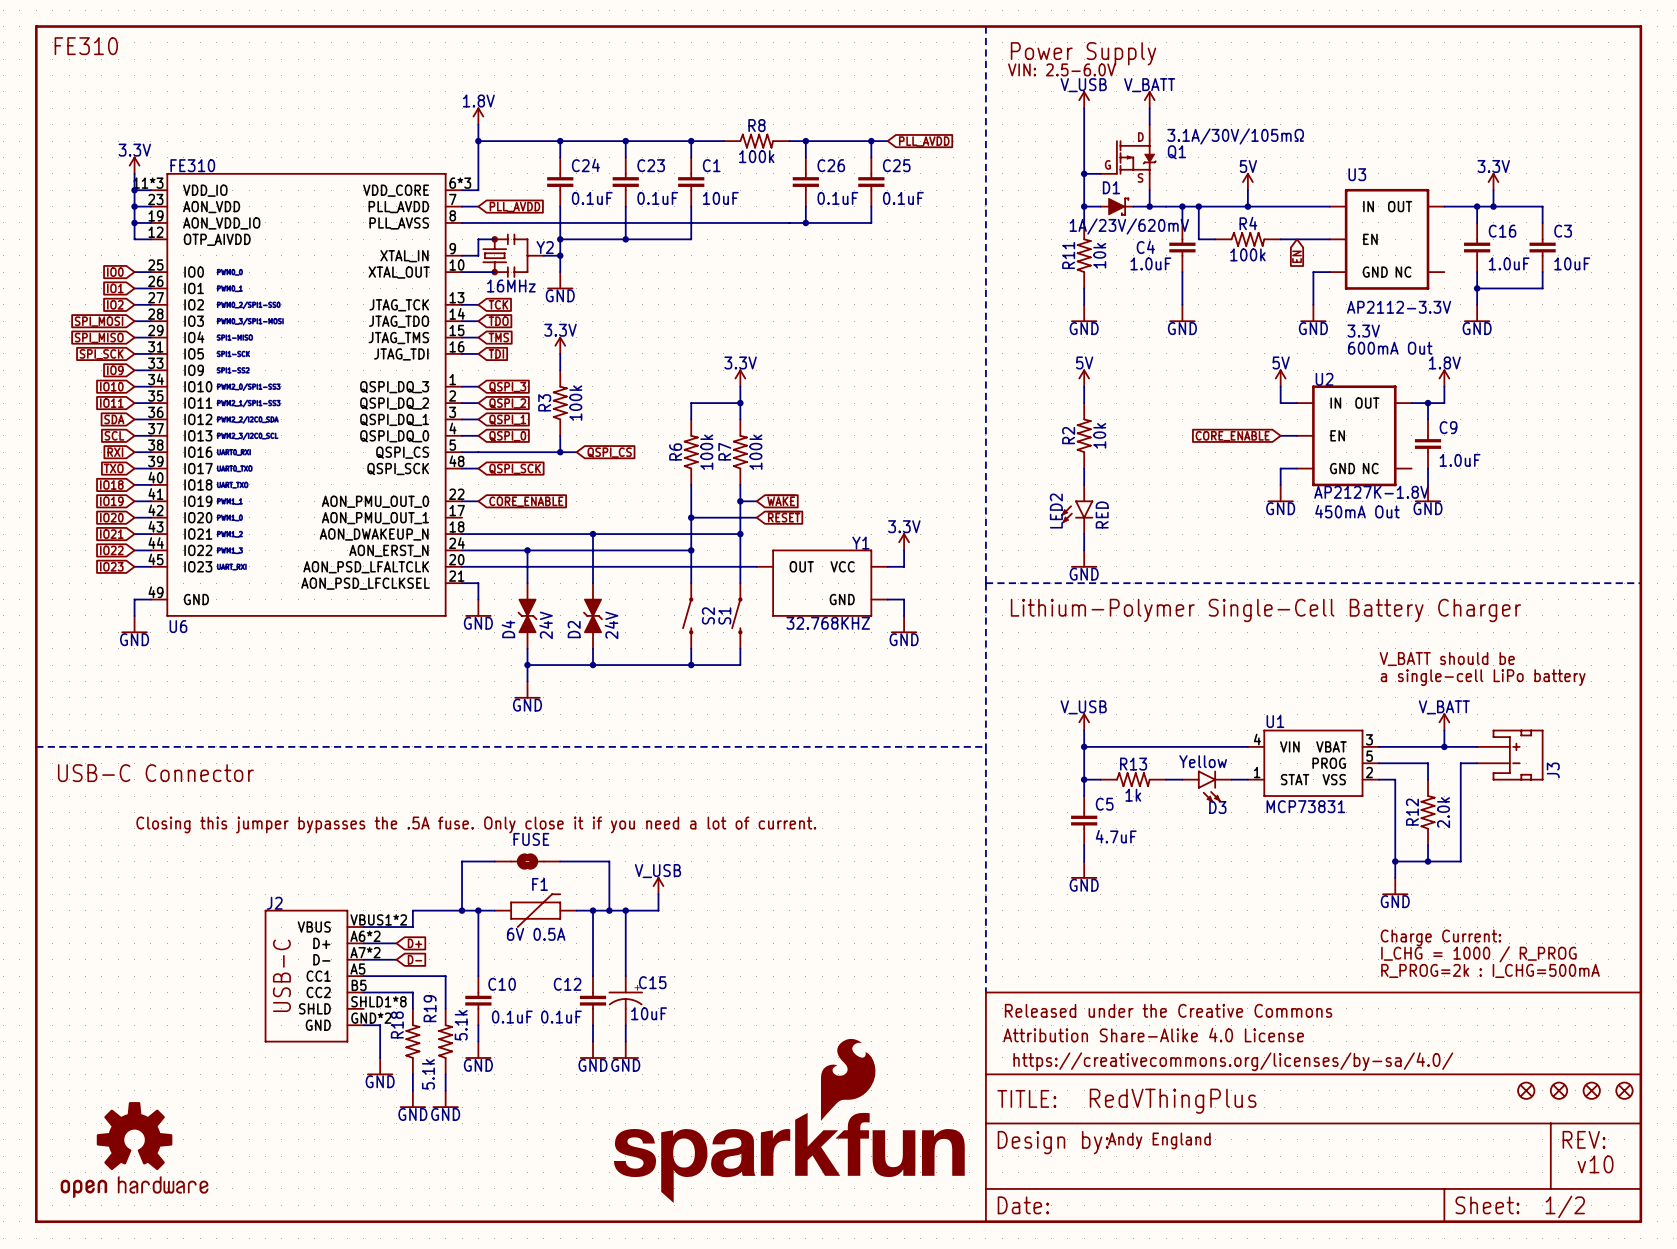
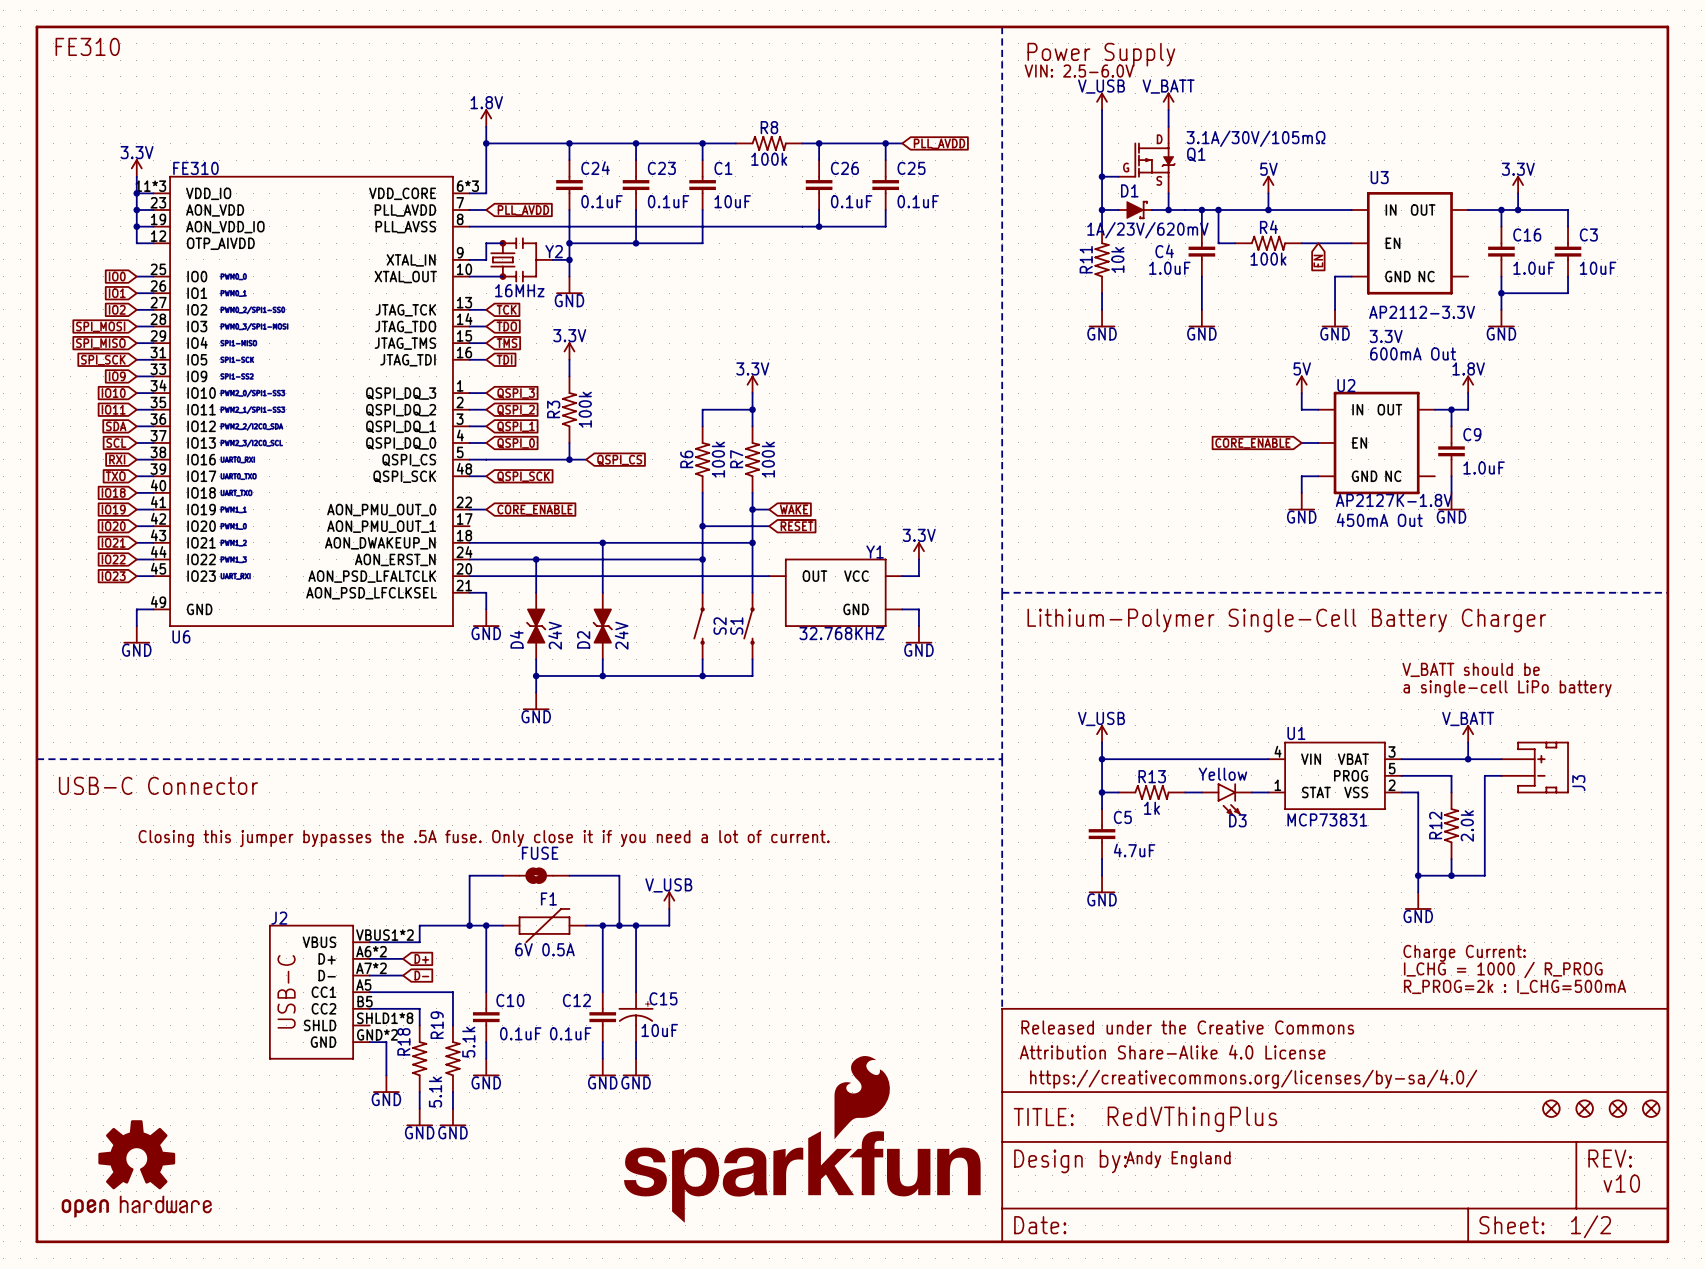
power symbol: 5V (1084, 378) -> none
wire: (1084, 386) (1084, 403) -> none
R2: 10k (1084, 435) -> none
wire: (1084, 468) (1084, 484) -> none
LED2: RED (1077, 509) -> none
wire: (1084, 534) (1084, 550) -> none
power symbol: GND (1084, 559) -> none

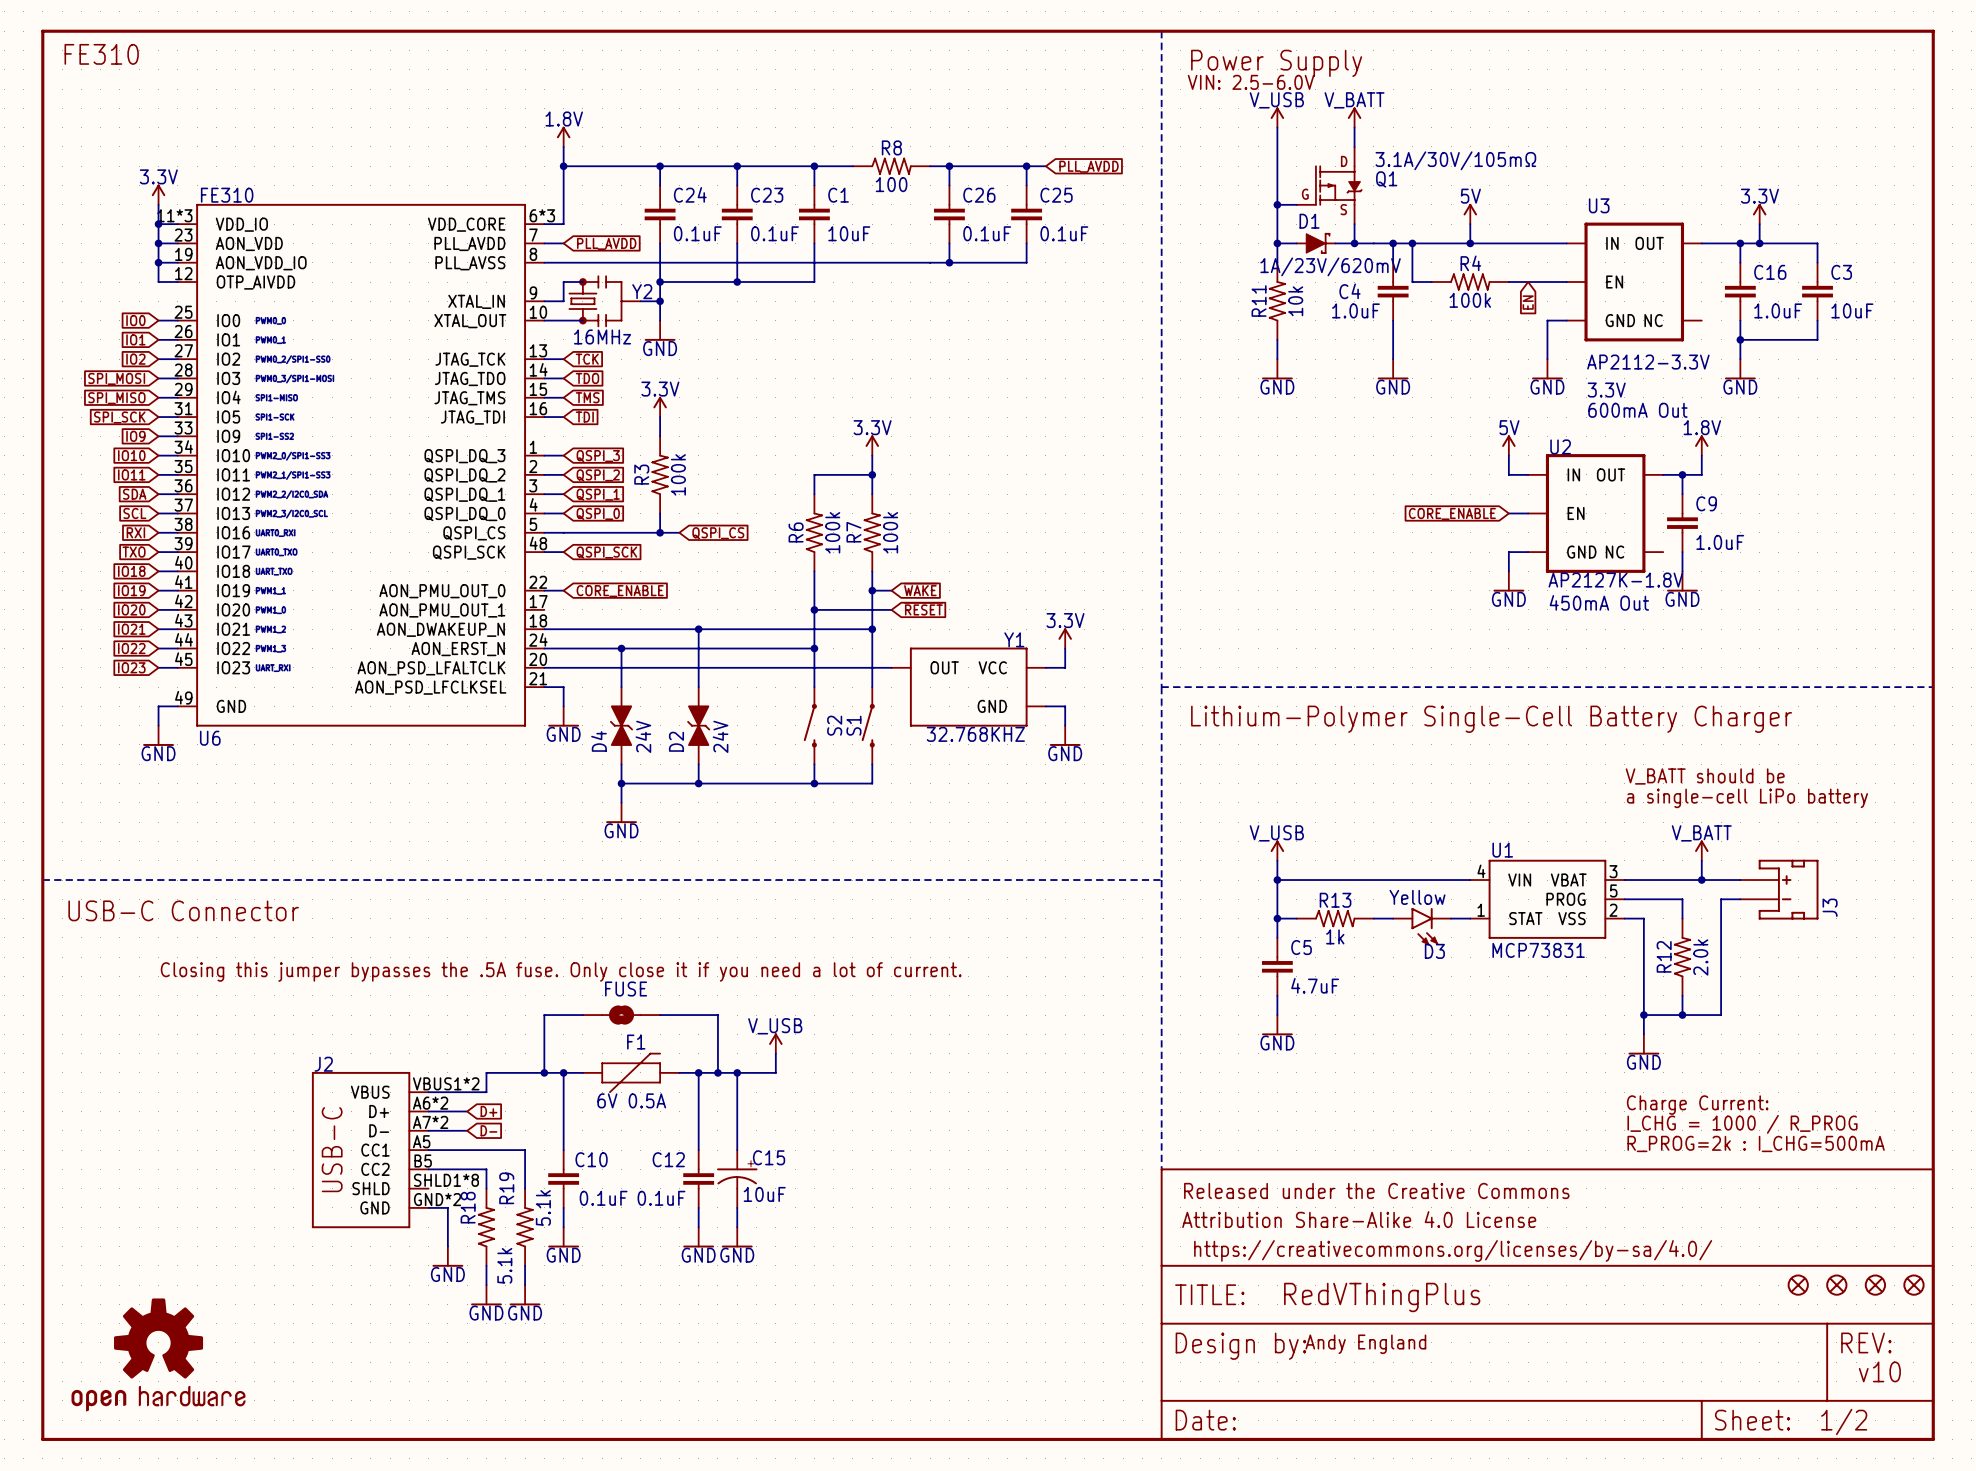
R8 value: 100k (769, 159) -> 100 (891, 184)
part: (802, 1139) -> none

